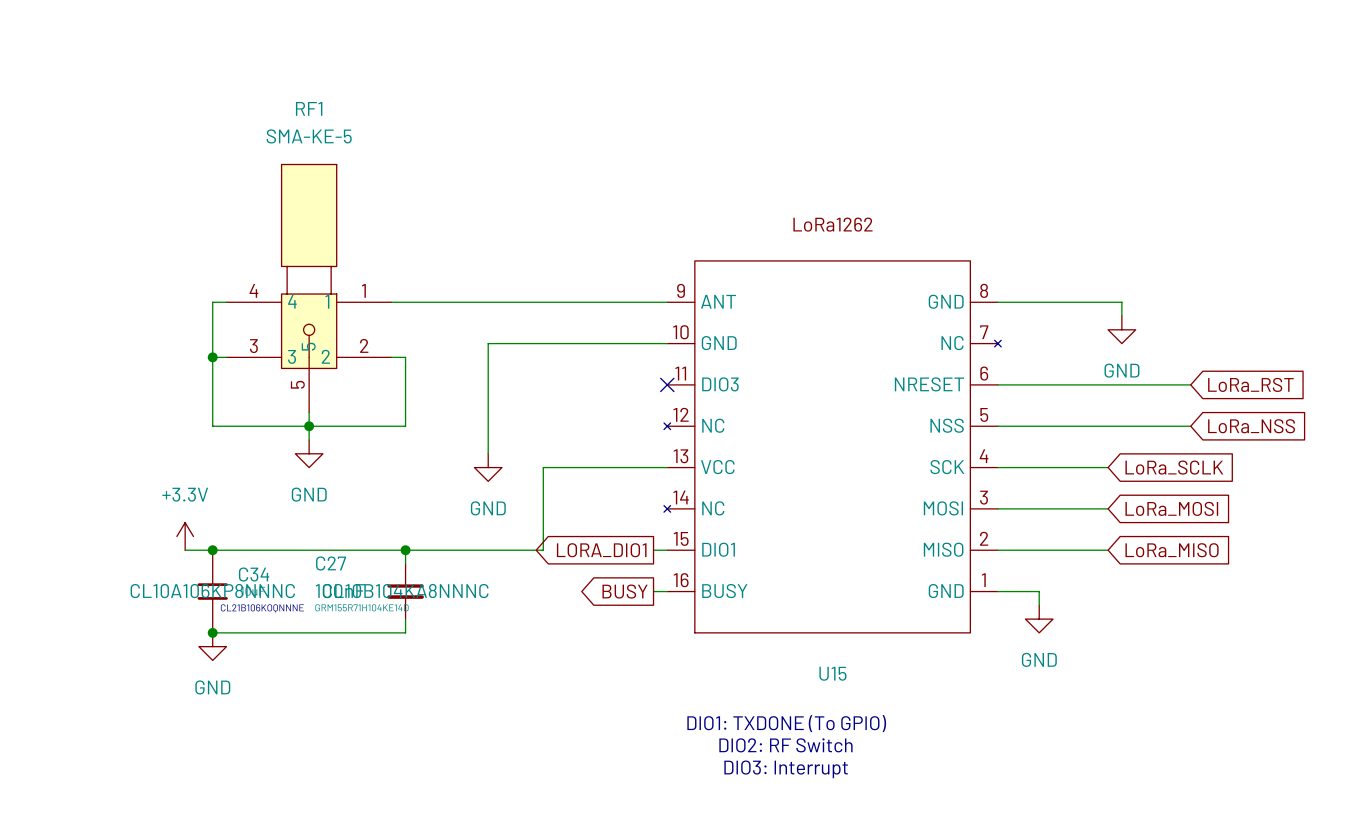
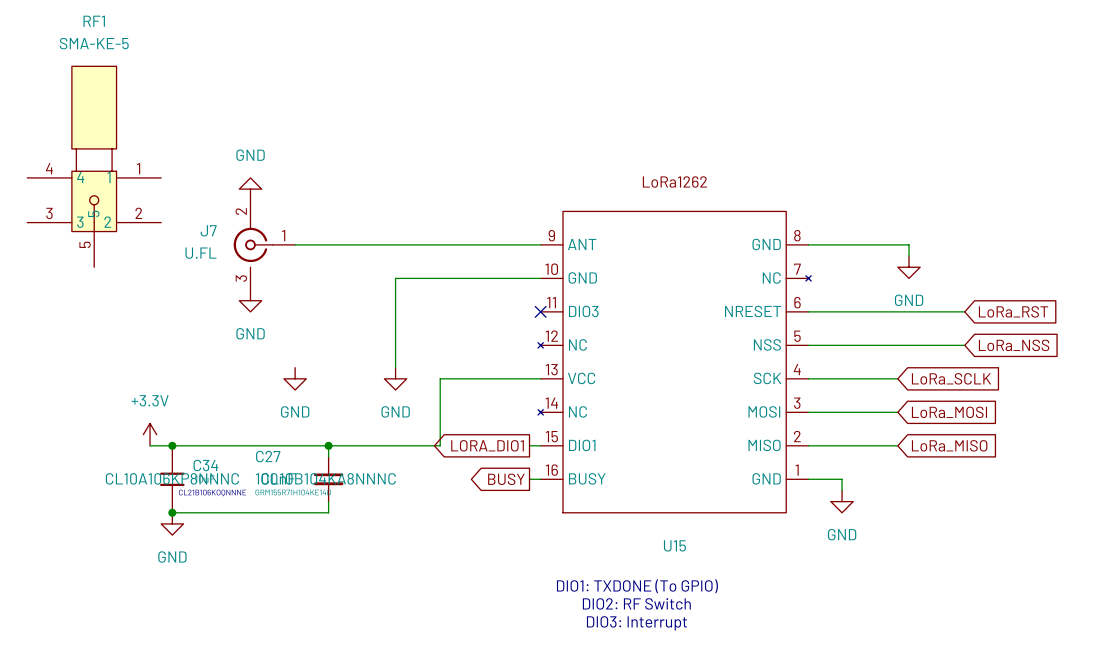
power symbol: none -> GND (250, 189)
RF1 position: (309, 288) -> (94, 166)
wire: (226, 302) (212, 302) (212, 426) (405, 426) (405, 357) (391, 357) -> none
J7: none -> U.FL (264, 244)
wire: (212, 357) (226, 357) -> none
junction: (212, 357) -> none
power symbol: none -> GND (250, 300)
wire: (309, 412) (309, 440) -> none
junction: (309, 426) -> none
power symbol: GND (309, 453) -> none
power symbol: none -> GND (295, 378)

